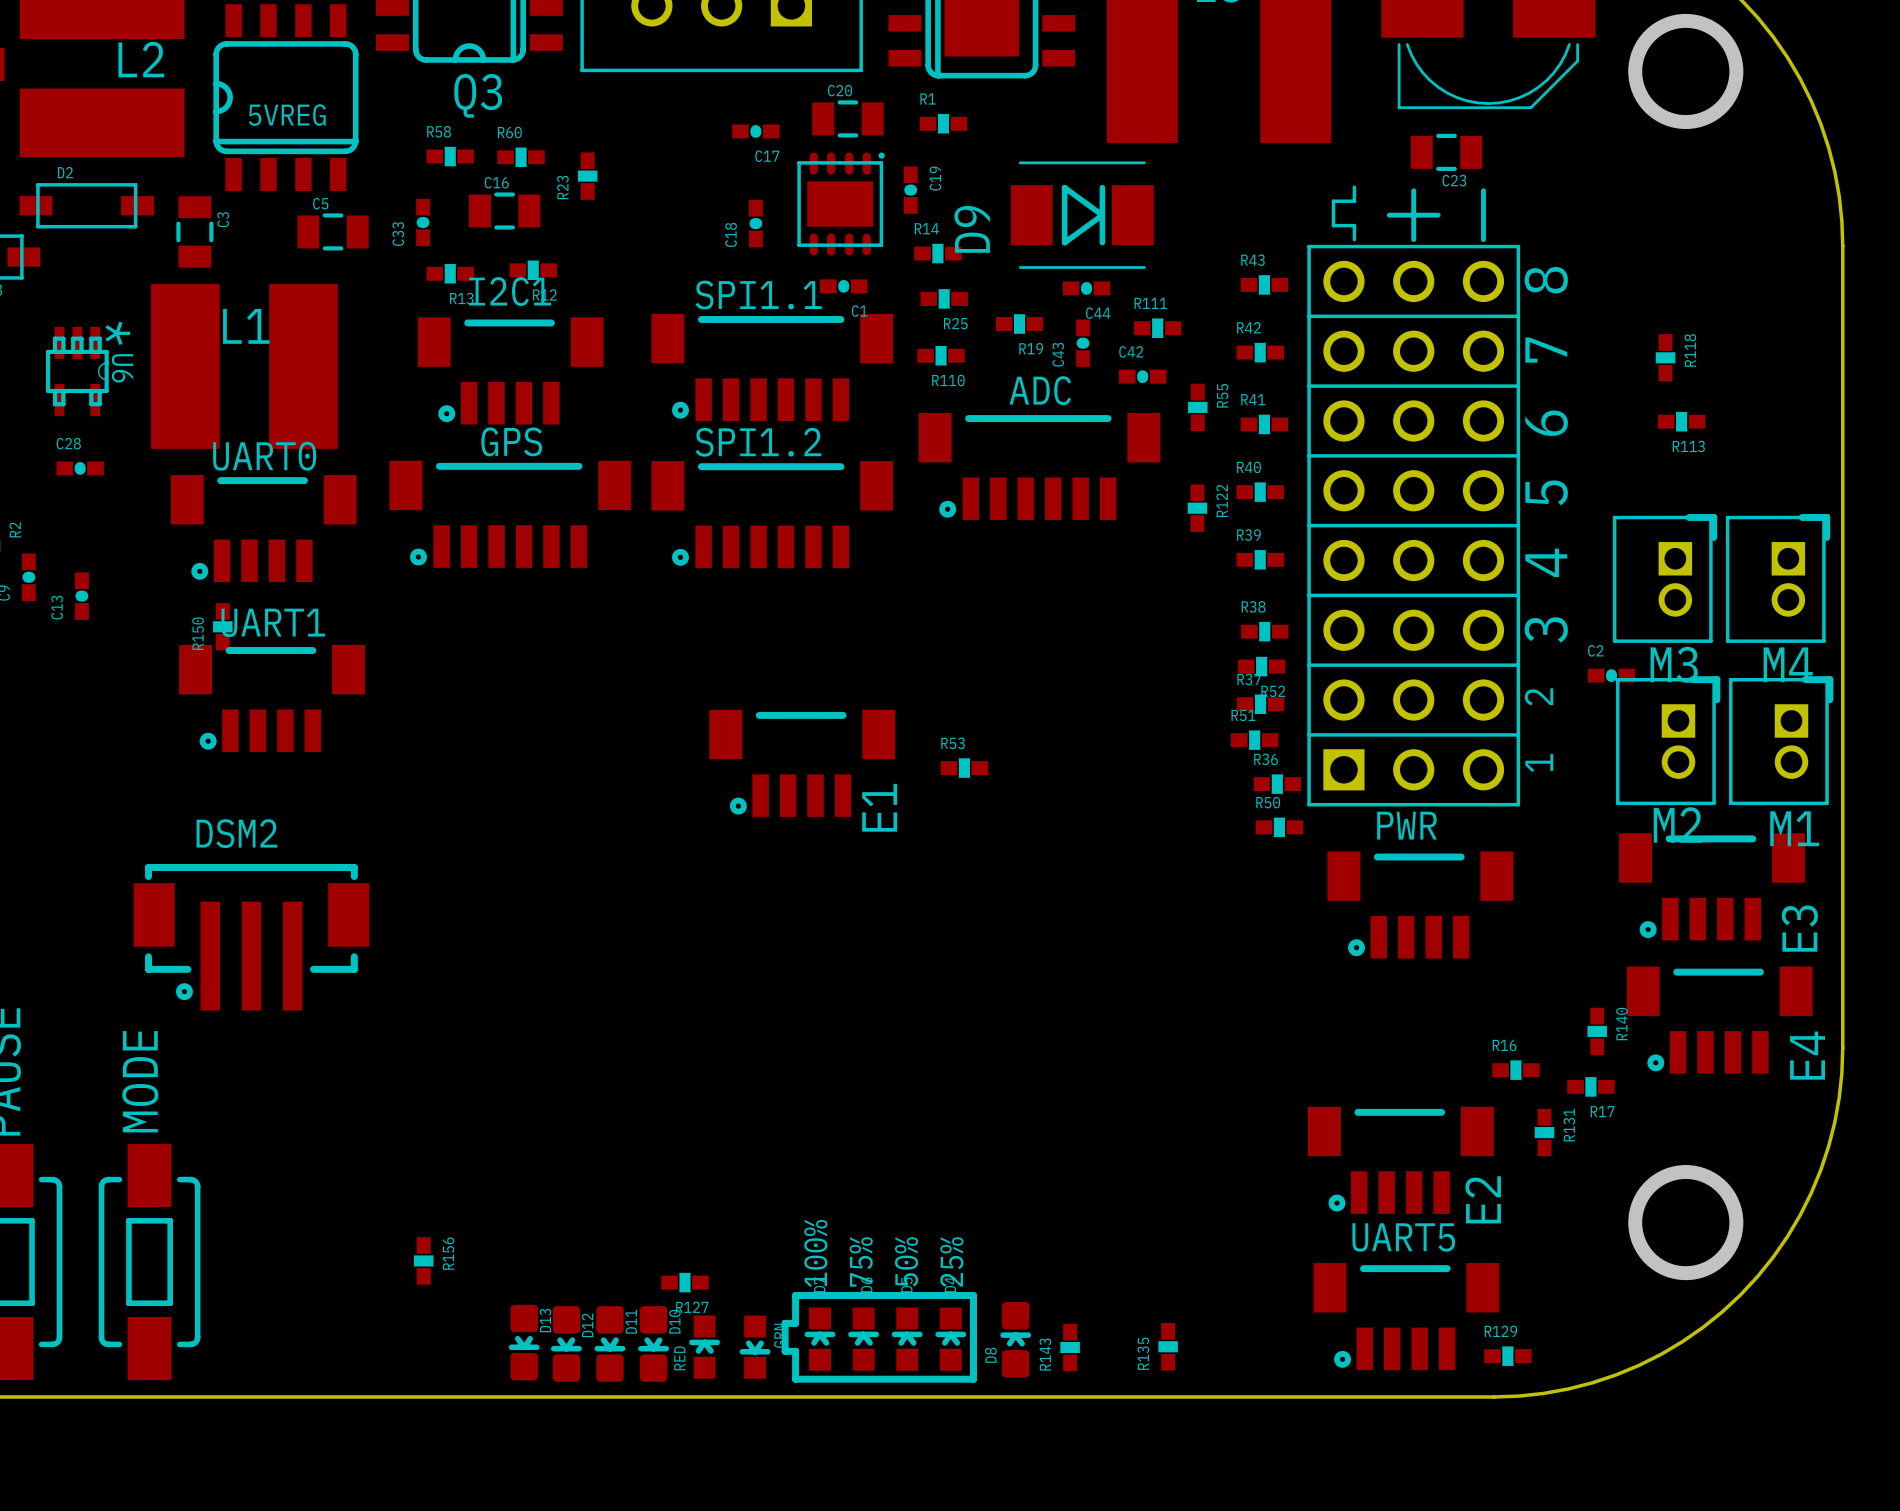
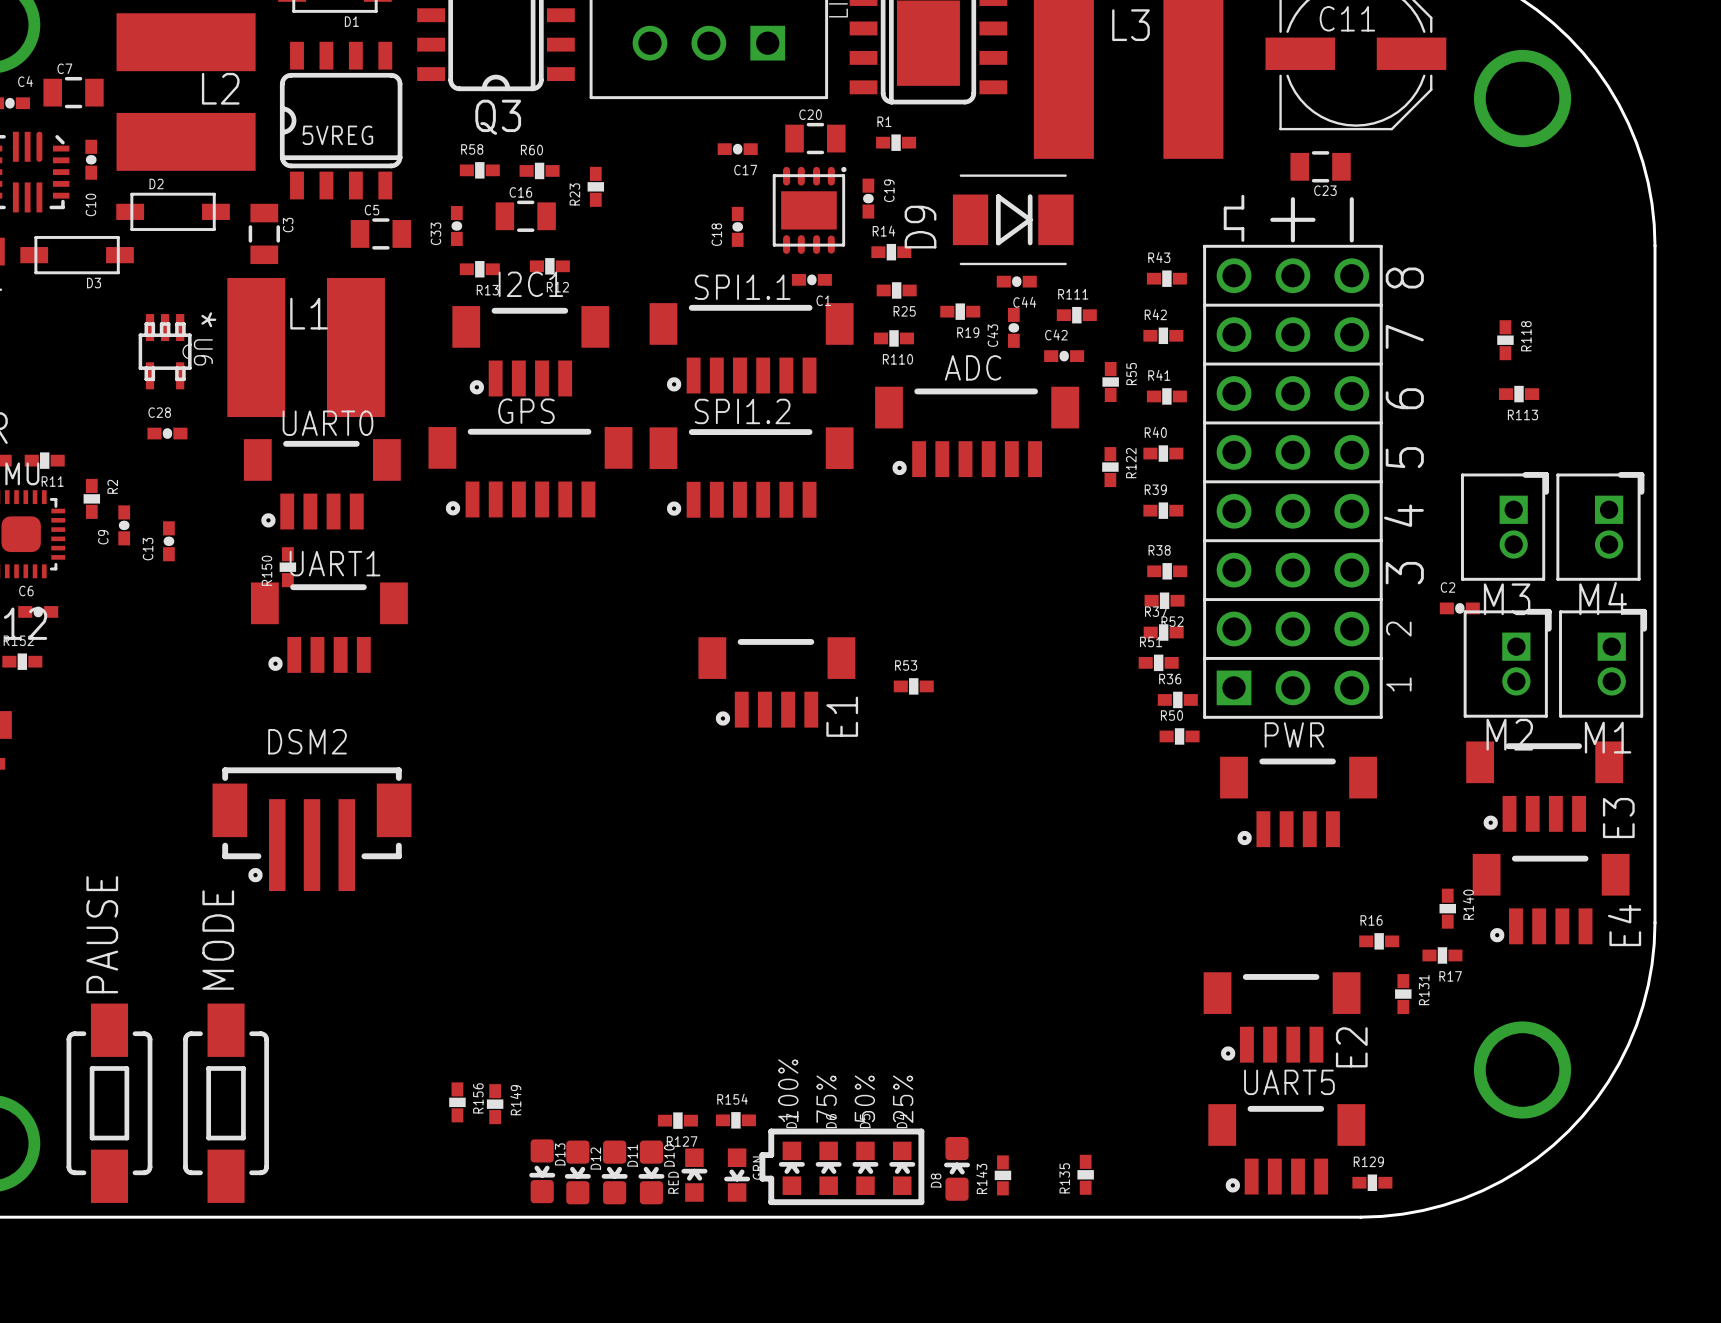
R149: none -> (495, 1104)
R154: none -> (735, 1120)

